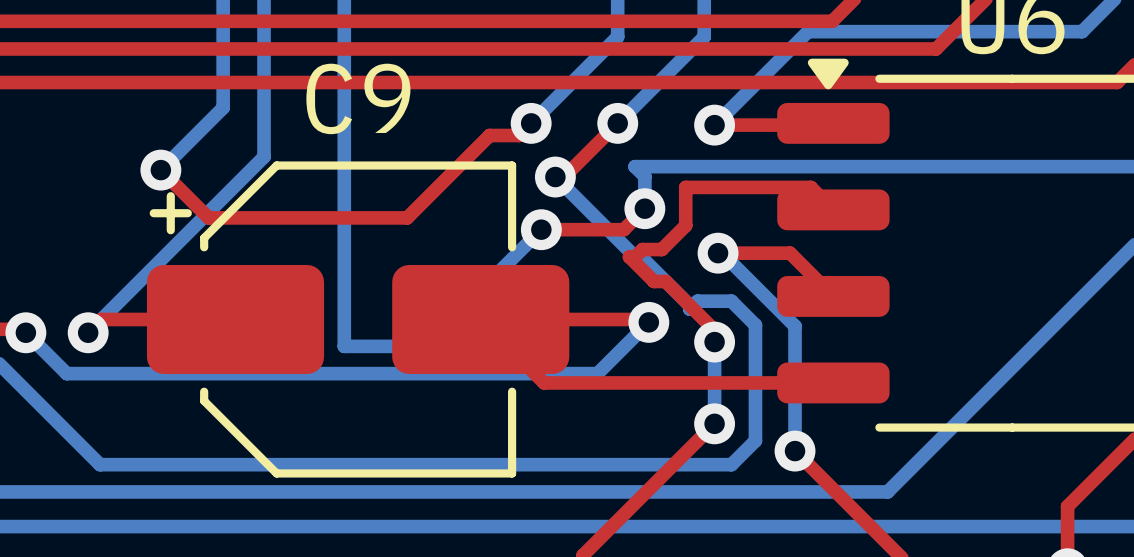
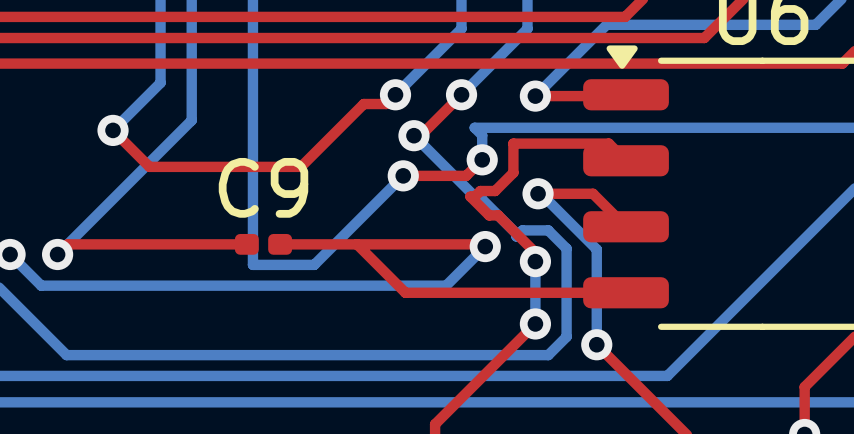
C9 name position: C9 (358, 98) -> C9 (263, 187)
C9 footprint: [146, 161, 570, 478] -> [234, 233, 293, 255]
top track: none -> (169, 244) (246, 244)
top track: none -> (280, 244) (357, 244)

